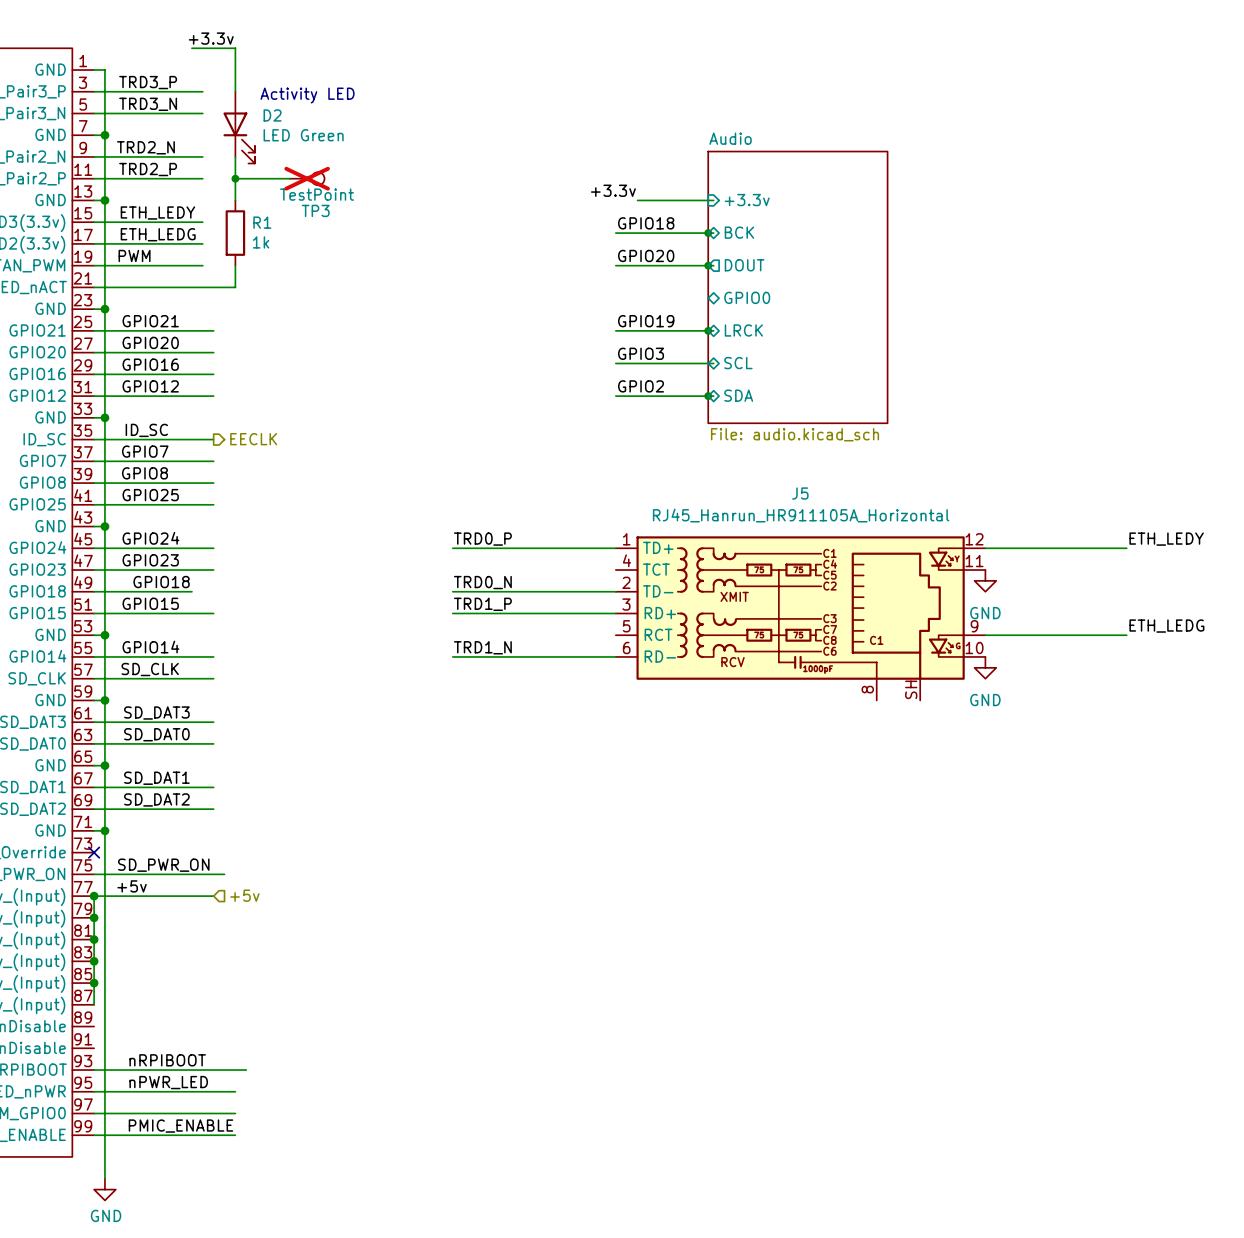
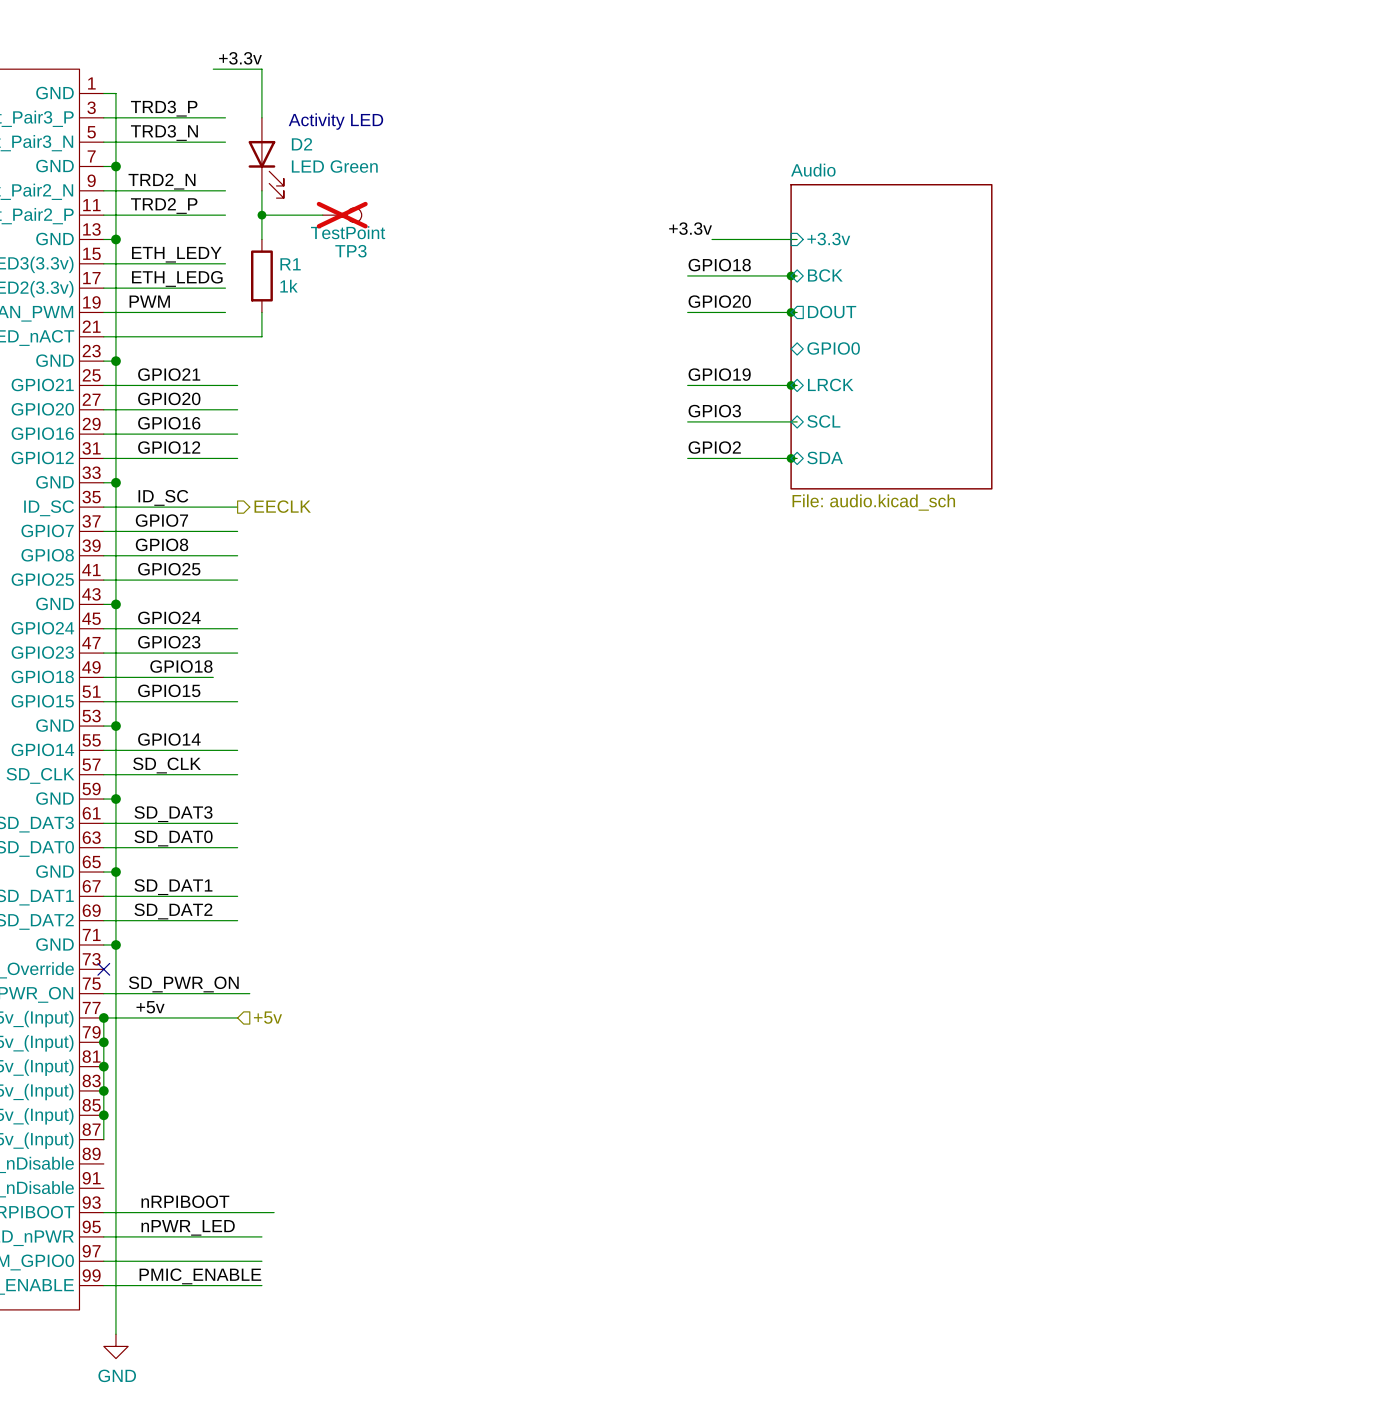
label: TRD0_P (482, 539) -> none
label: ETH_LEDY (1166, 539) -> none
wire: (452, 548) (615, 548) -> none
wire: (985, 548) (1126, 548) -> none
power symbol: GND (985, 580) -> none
label: TRD0_N (482, 582) -> none
wire: (452, 591) (615, 591) -> none
label: TRD1_P (482, 604) -> none
wire: (452, 613) (615, 613) -> none
J5: RJ45_Hanrun_HR911105A_Horizontal (800, 618) -> none
label: ETH_LEDG (1166, 626) -> none
wire: (985, 635) (1126, 635) -> none
label: TRD1_N (482, 647) -> none
wire: (452, 656) (615, 656) -> none
power symbol: GND (985, 667) -> none

